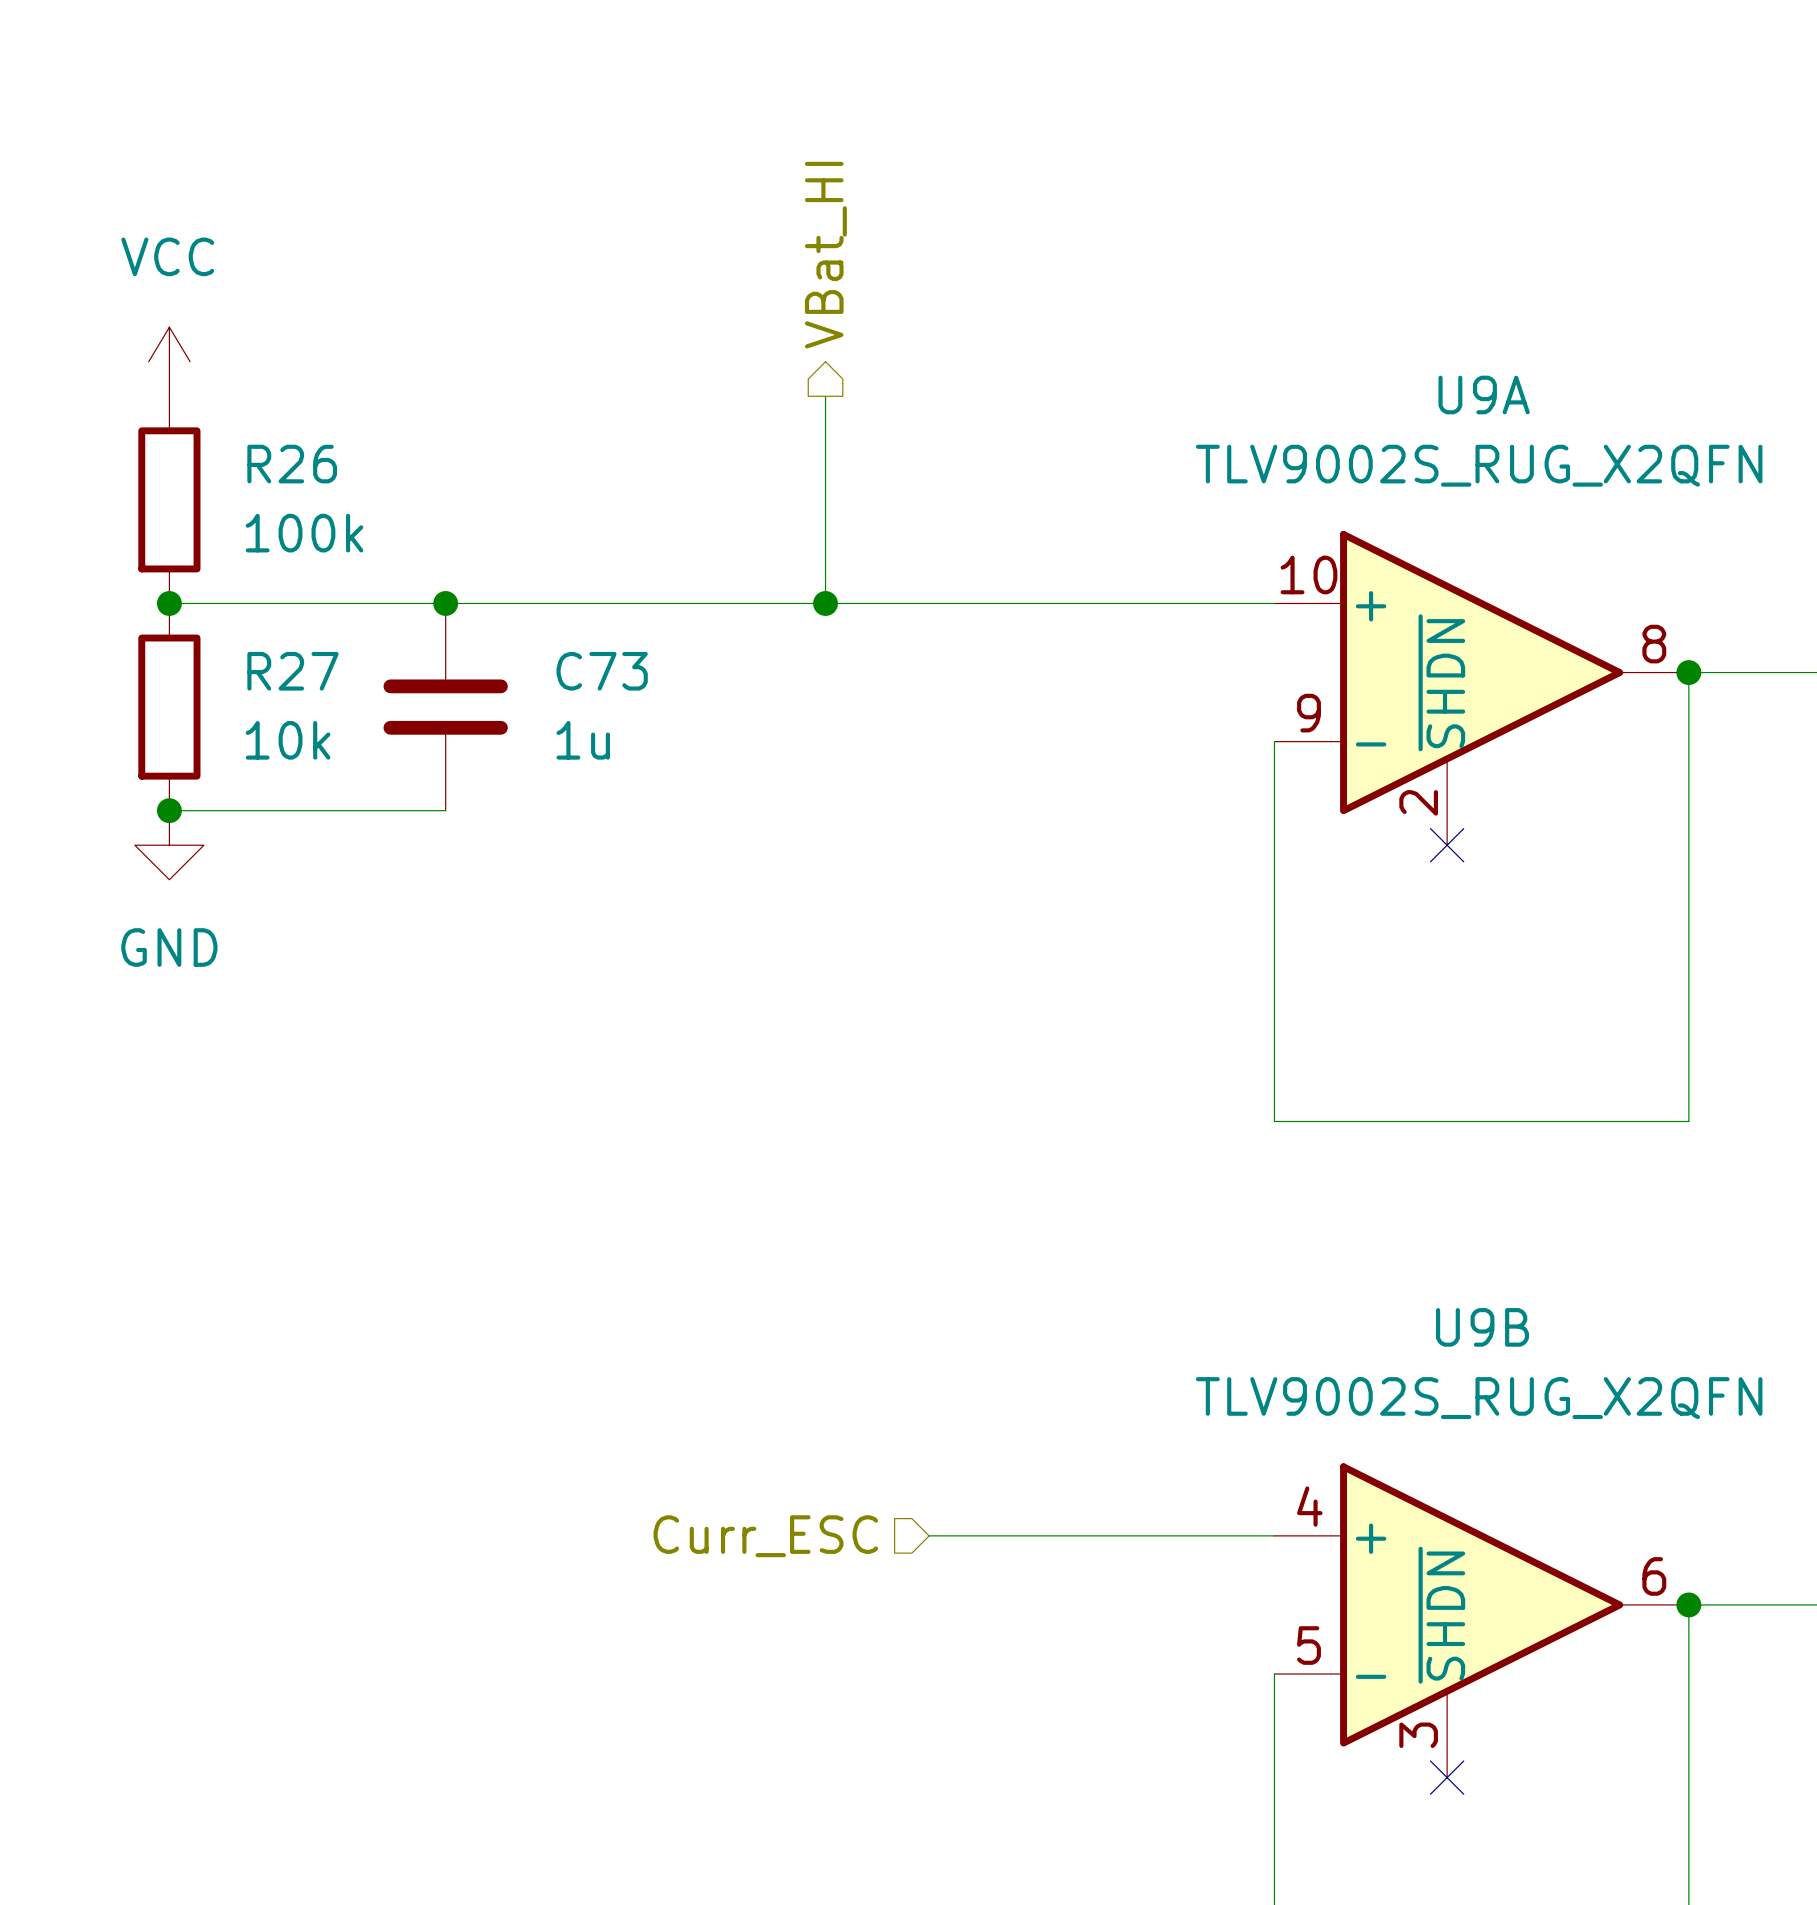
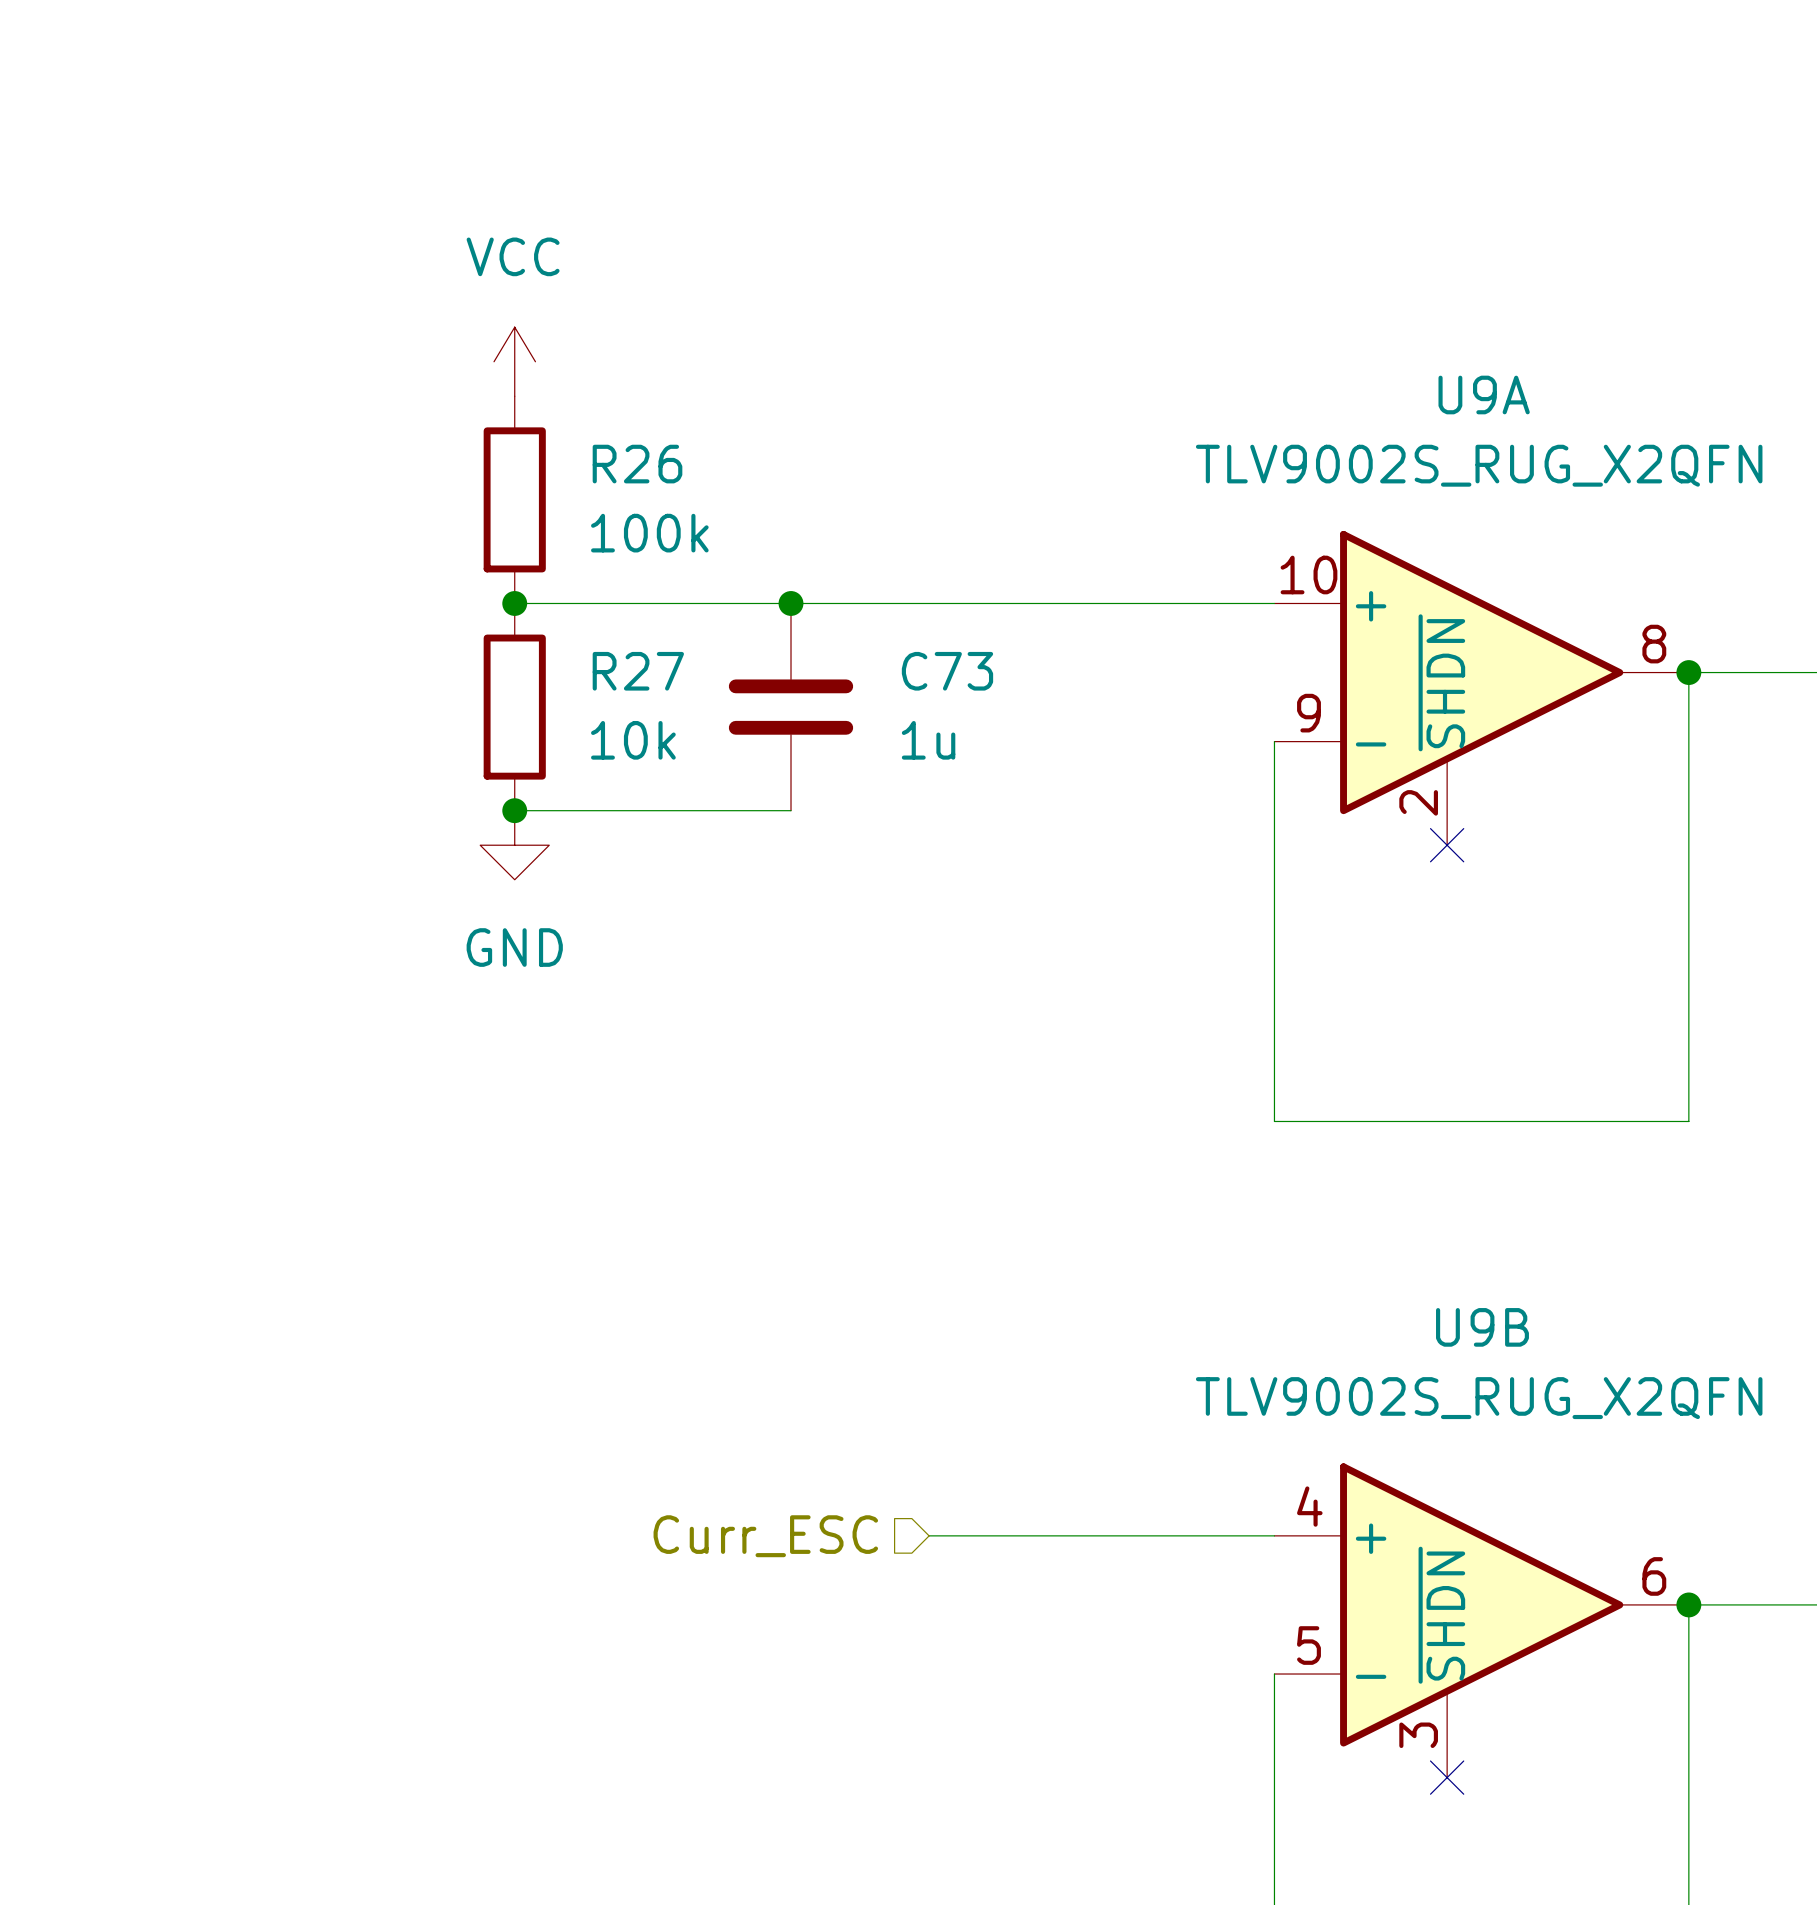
hierarchical label: VBat_HI (825, 255) -> none
power symbol position: VCC (169, 361) -> VCC (514, 361)
wire: (825, 396) (825, 603) -> none
R26 position: (169, 499) -> (514, 499)
wire: (169, 603) (514, 603) -> none
junction: (169, 603) -> none
junction position: (445, 603) -> (514, 603)
junction position: (825, 603) -> (791, 603)
R27 position: (169, 707) -> (514, 707)
C73 position: (445, 707) -> (791, 707)
wire: (169, 810) (445, 810) -> (514, 810) (791, 810)
junction: (169, 810) -> none
junction: none -> (514, 810)
power symbol position: GND (169, 845) -> GND (514, 845)

